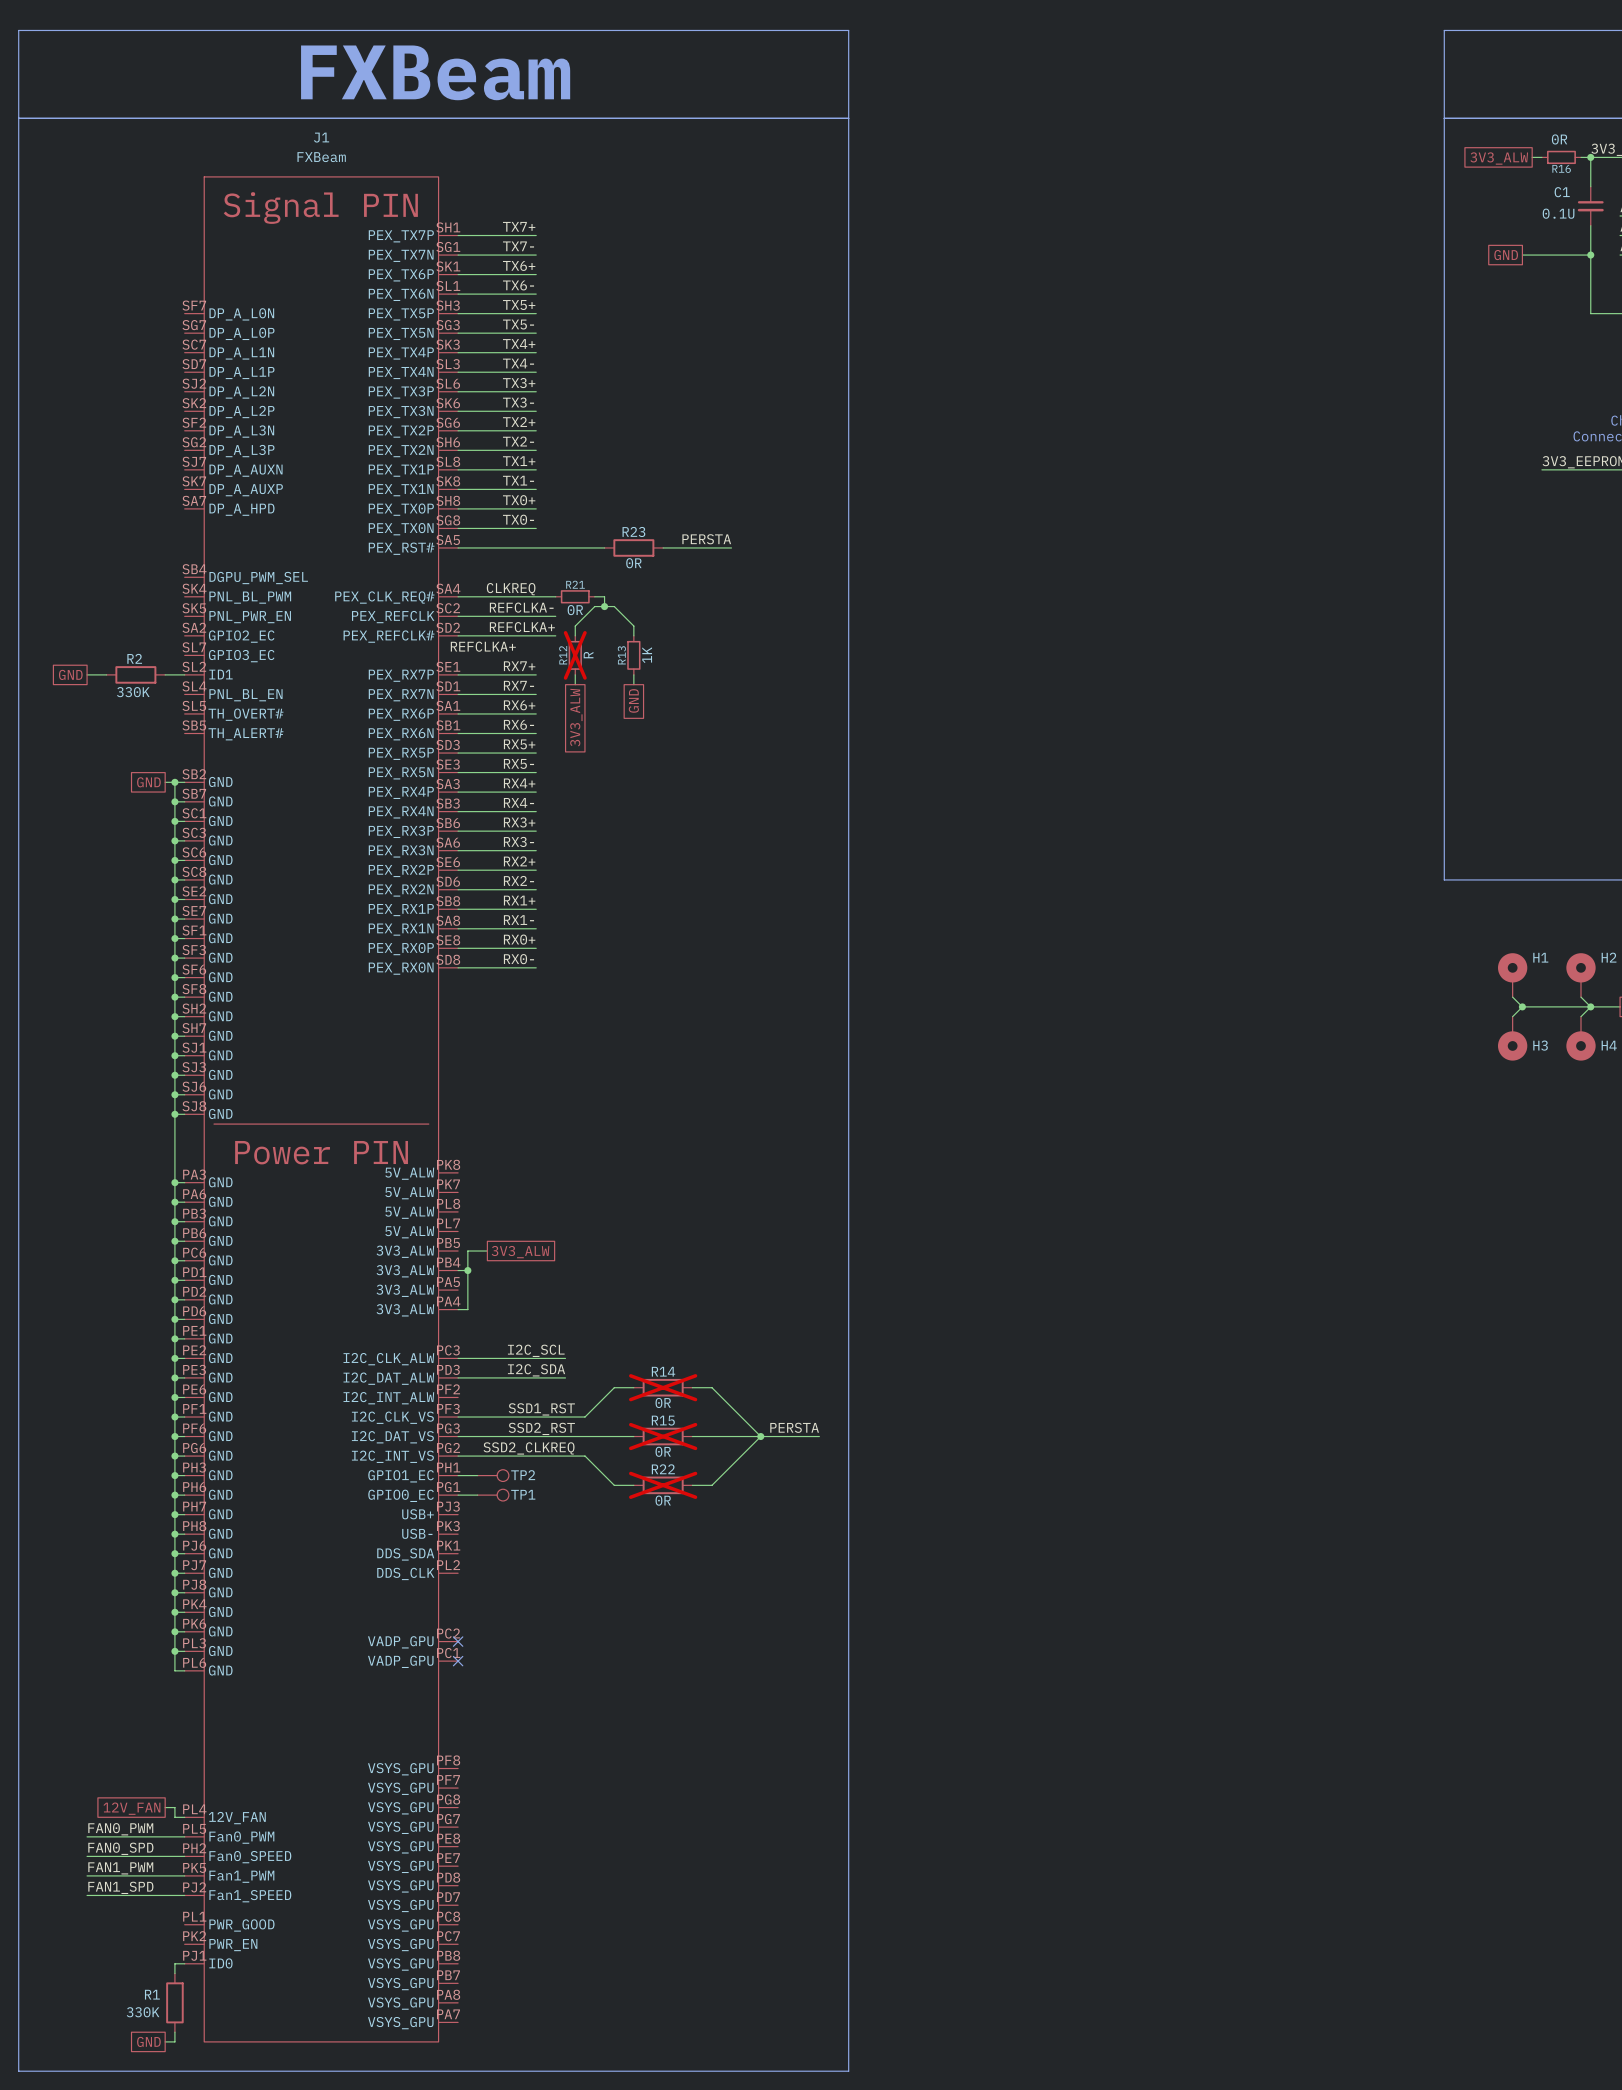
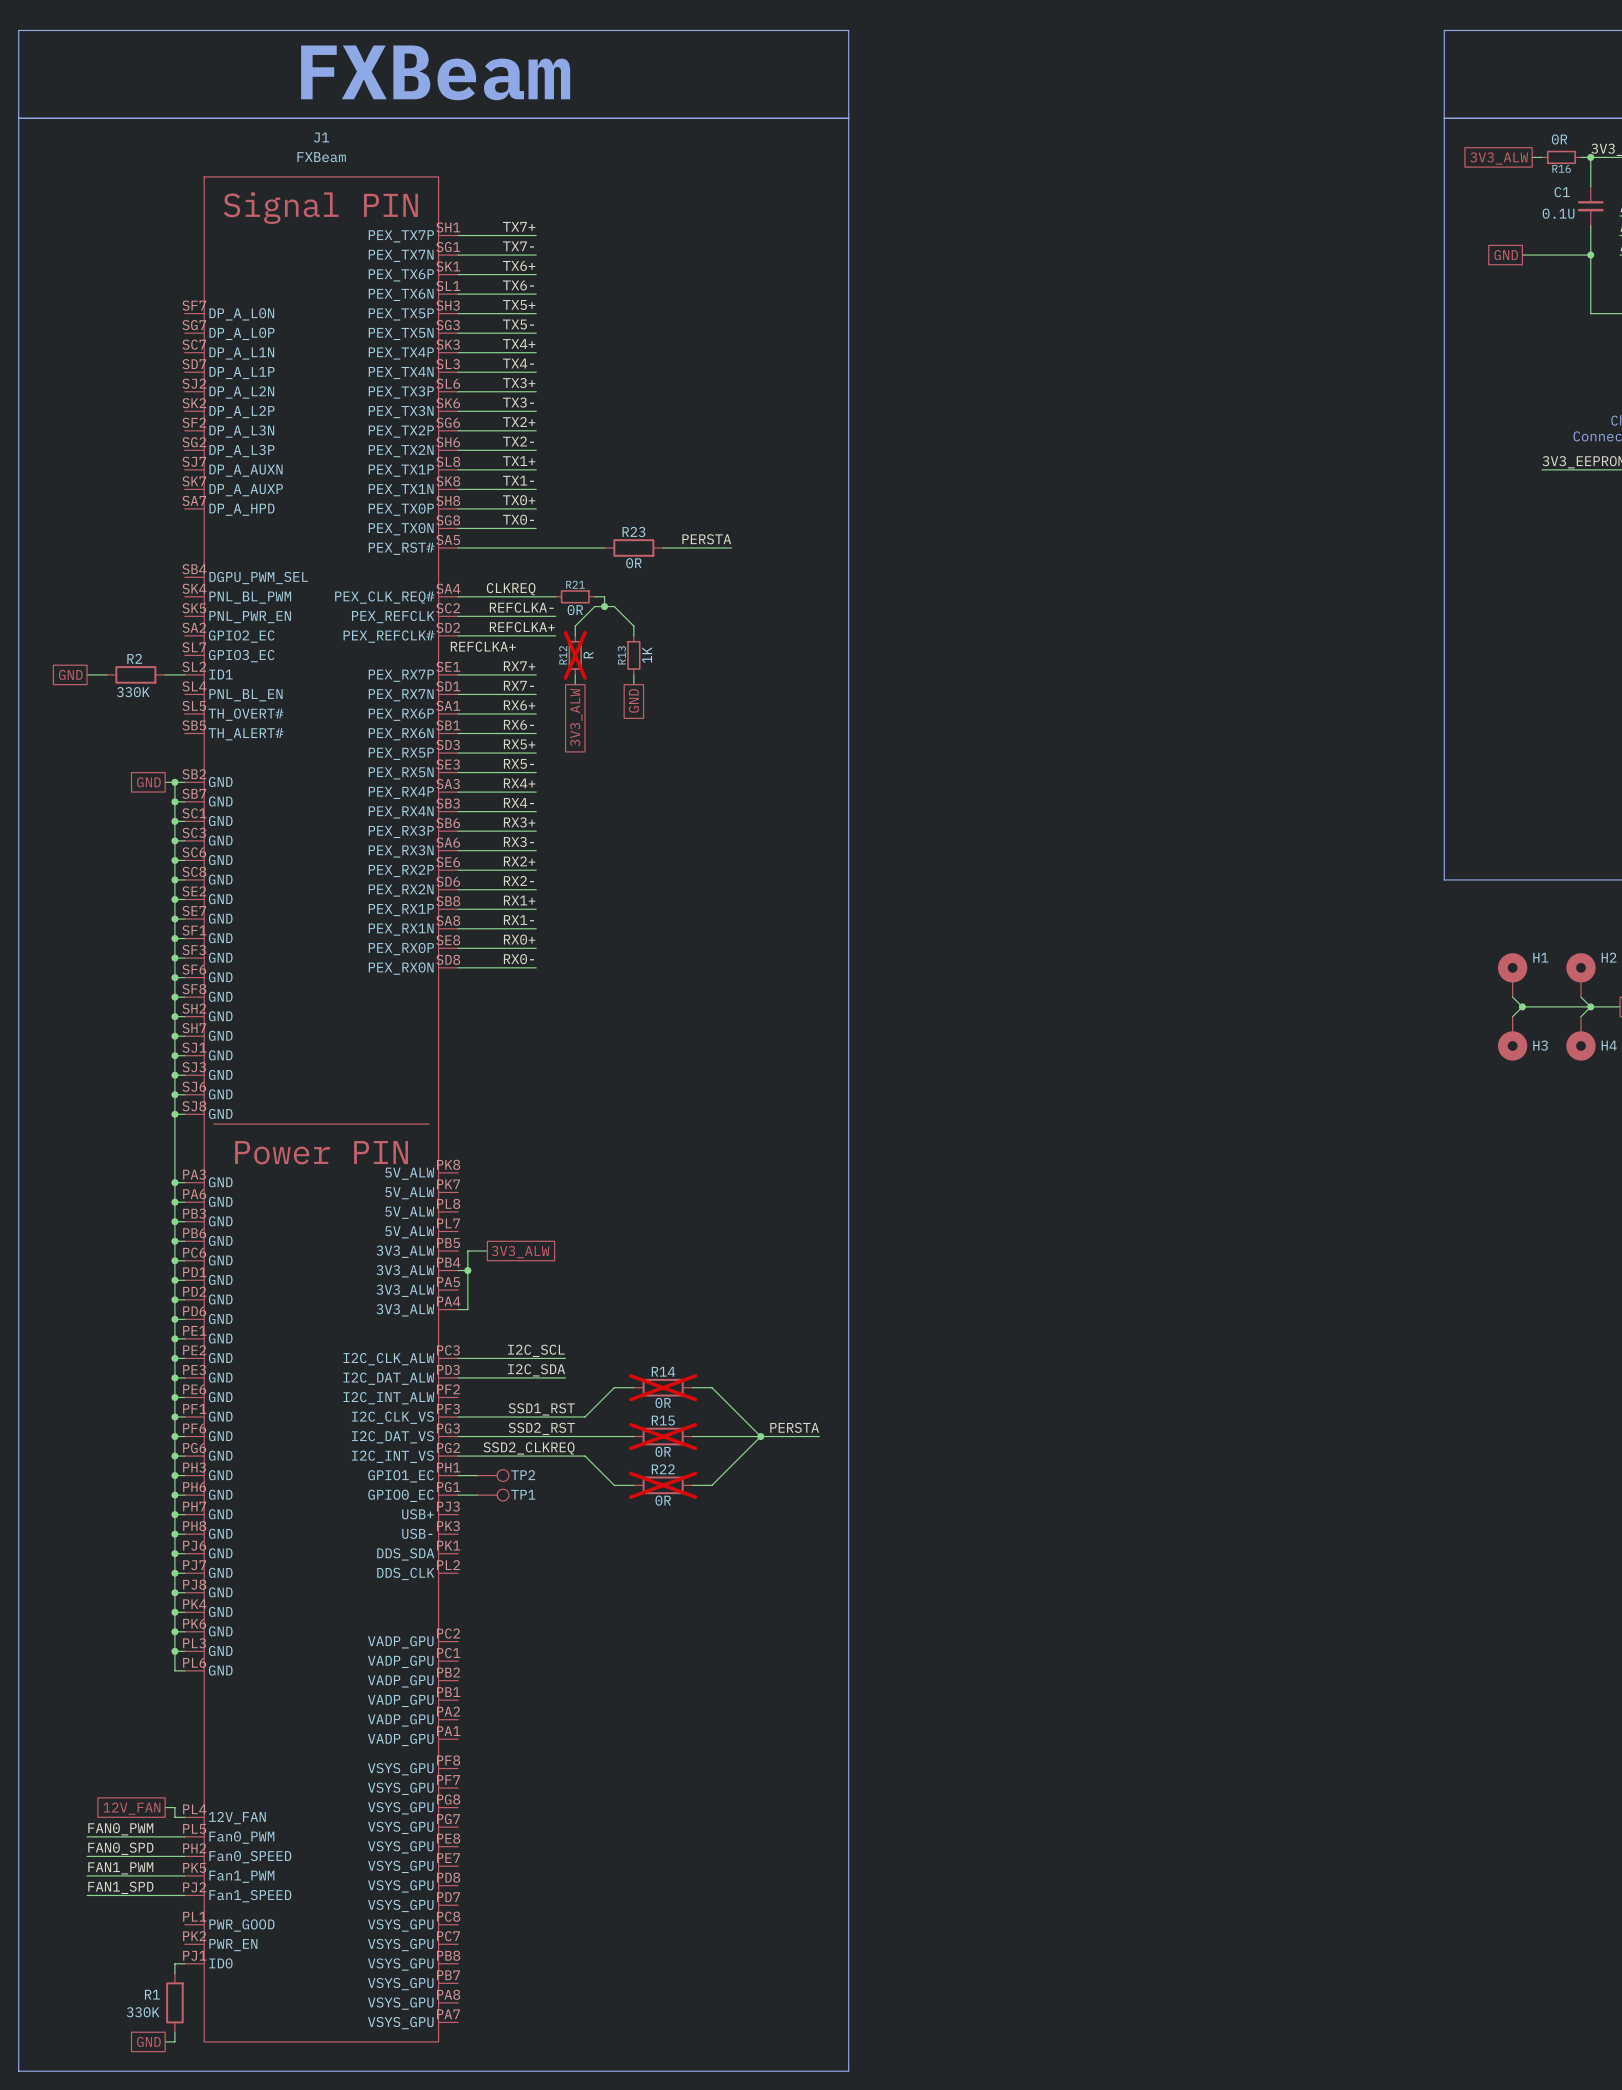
J1 symbol: [184, 176, 459, 2042] -> [184, 176, 459, 2042]
no-connect mark: (458, 1641) -> none
no-connect mark: (458, 1661) -> none

